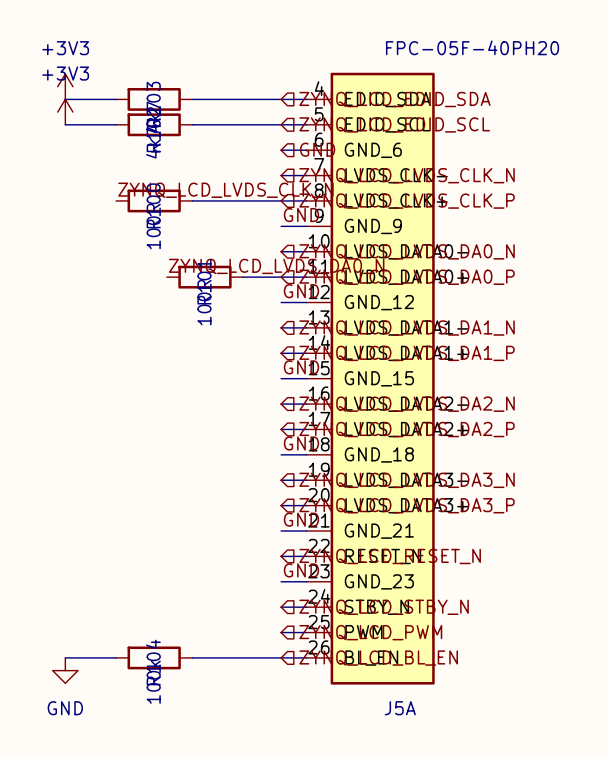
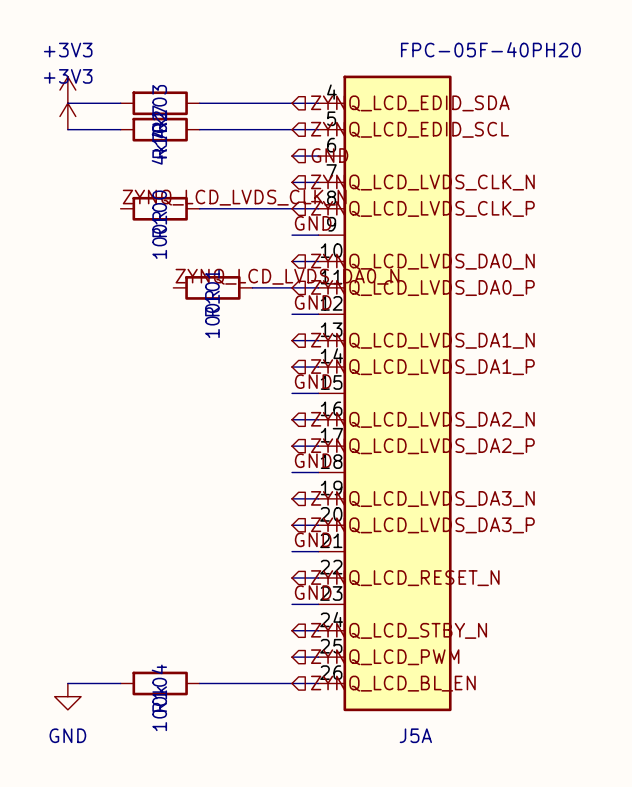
J5A symbol: [306, 72, 435, 685] -> [318, 75, 452, 712]

